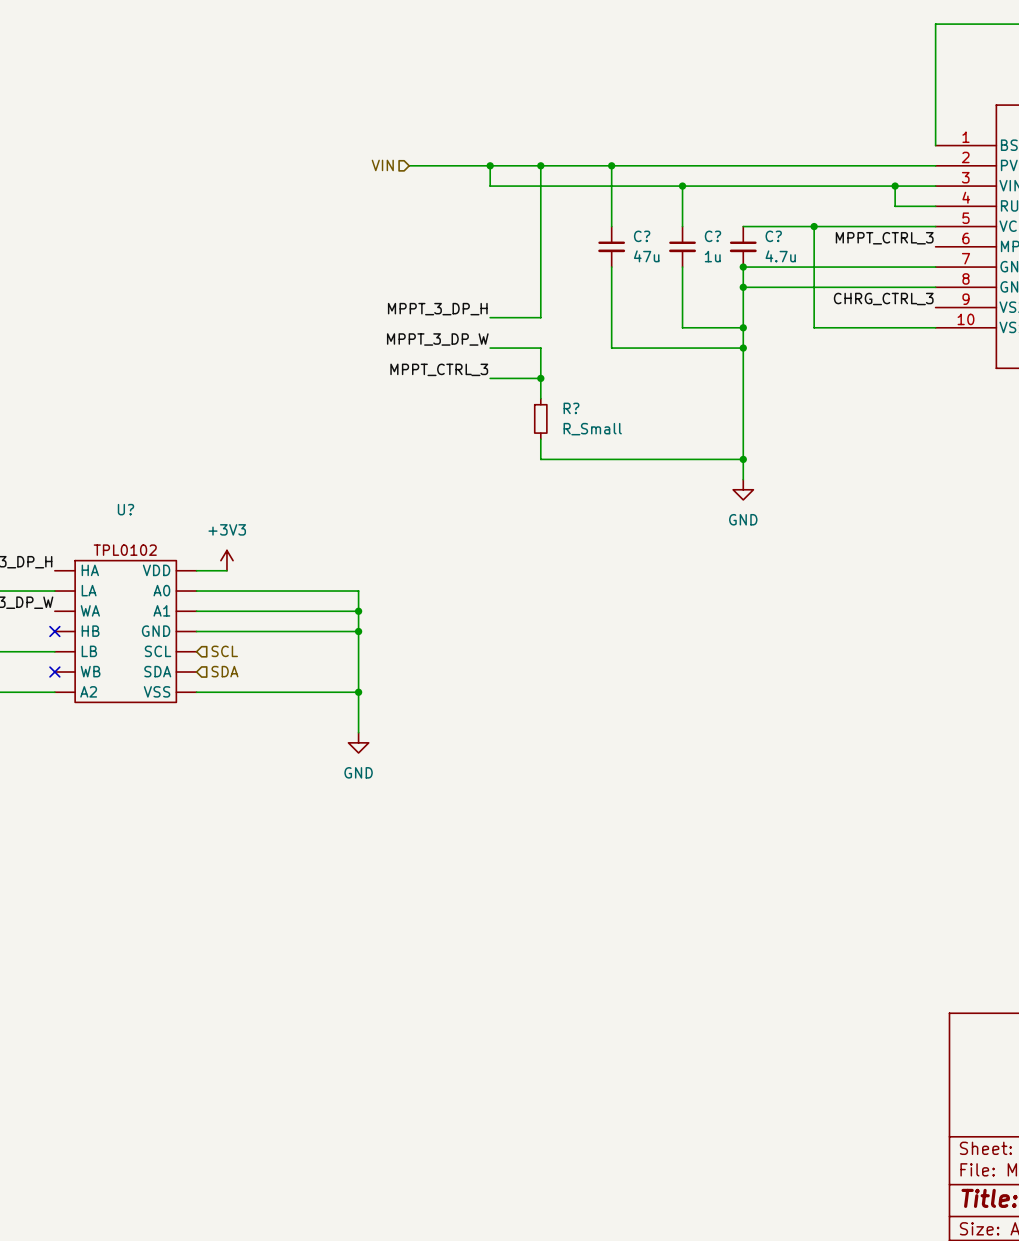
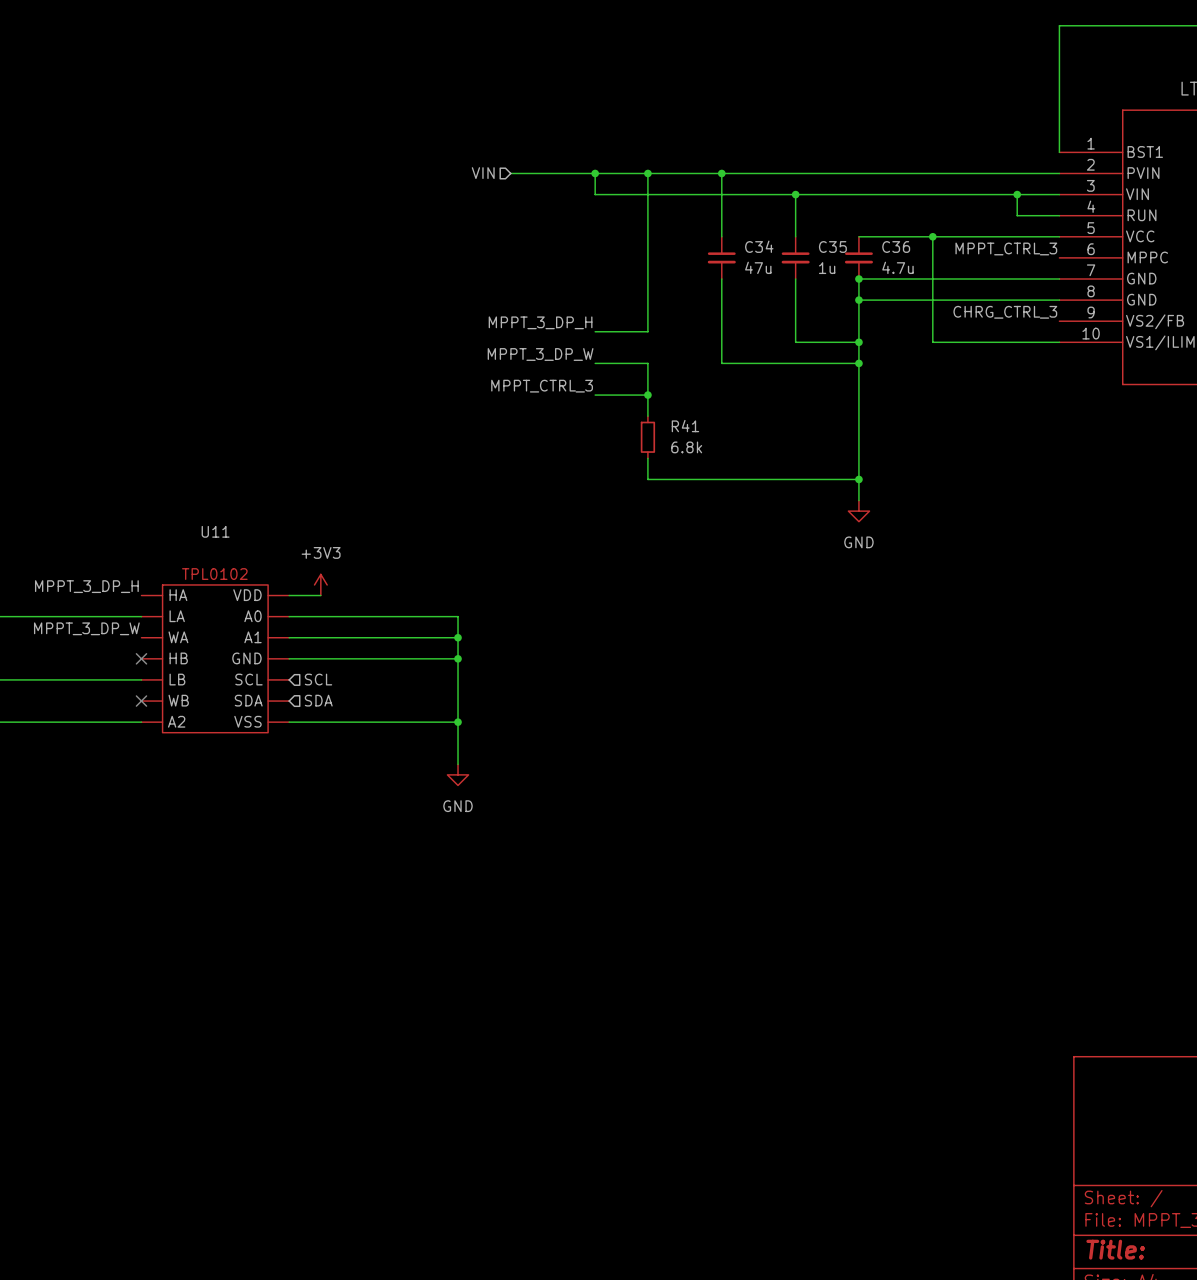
C? name: C? (642, 236) -> C34 (759, 246)
C? name: C? (712, 236) -> C35 (832, 247)
C? name: C? (773, 236) -> C36 (896, 247)
R? name: R? (571, 408) -> R41 (685, 426)
R? value: R_Small (592, 429) -> 6.8k (686, 447)
U? name: U? (125, 509) -> U11 (215, 531)

